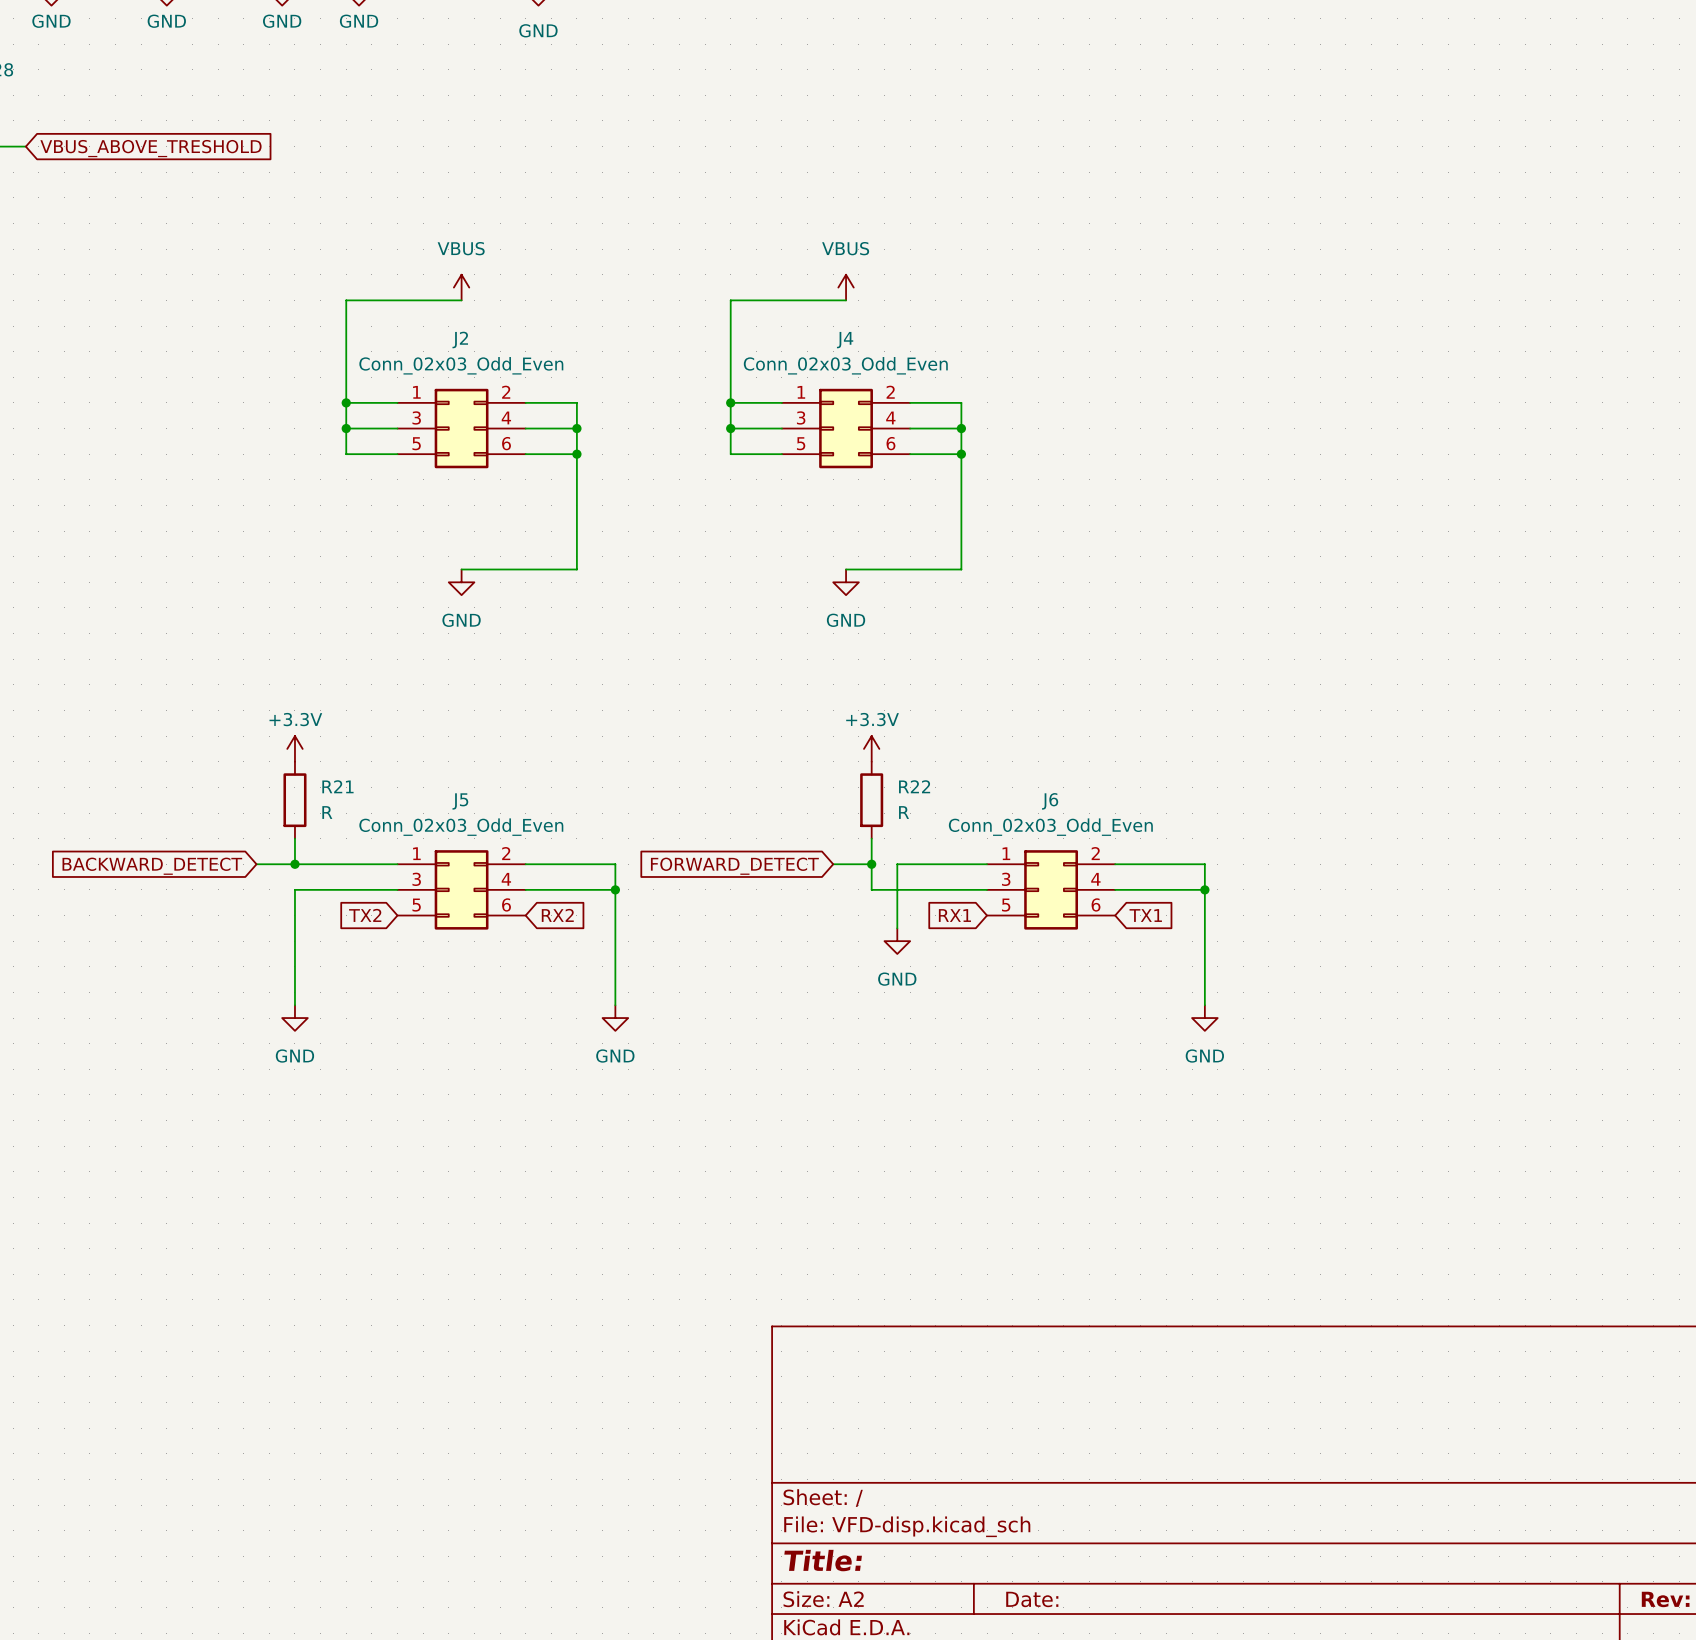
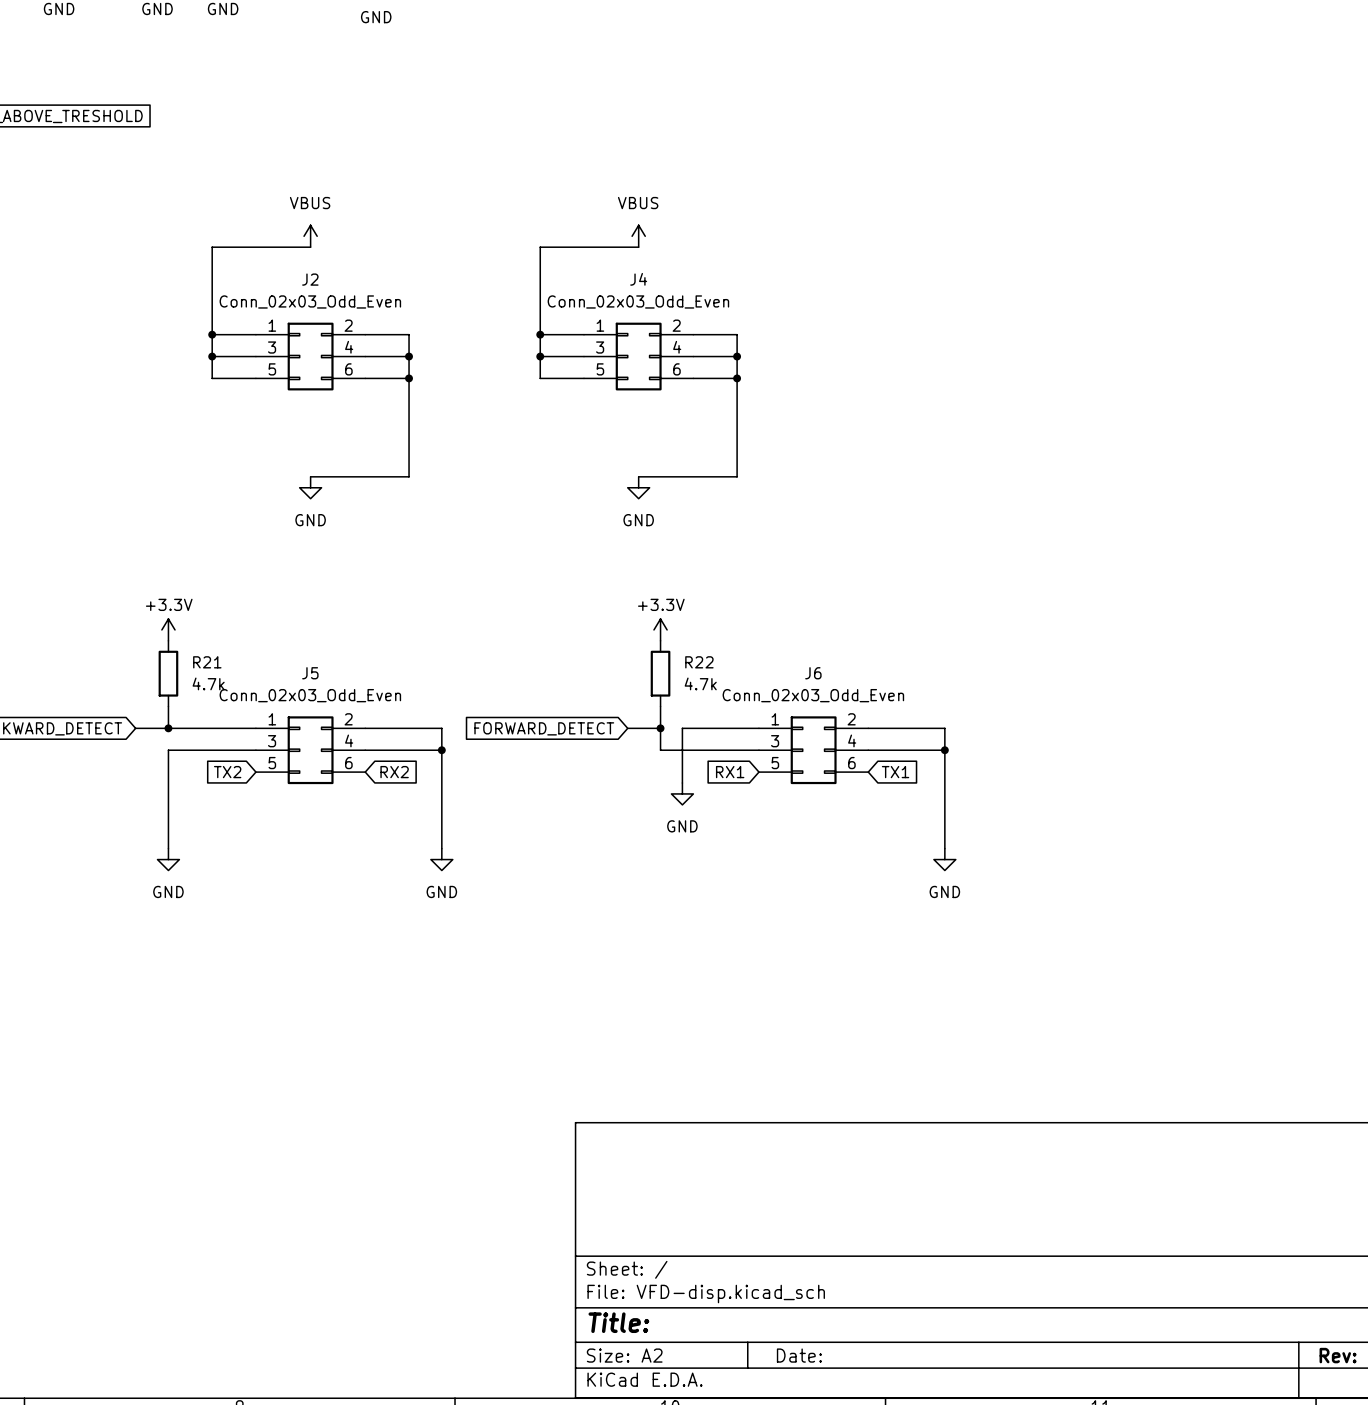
R21 value: R (327, 812) -> 4.7k (208, 683)
R22 value: R (904, 812) -> 4.7k (700, 683)

